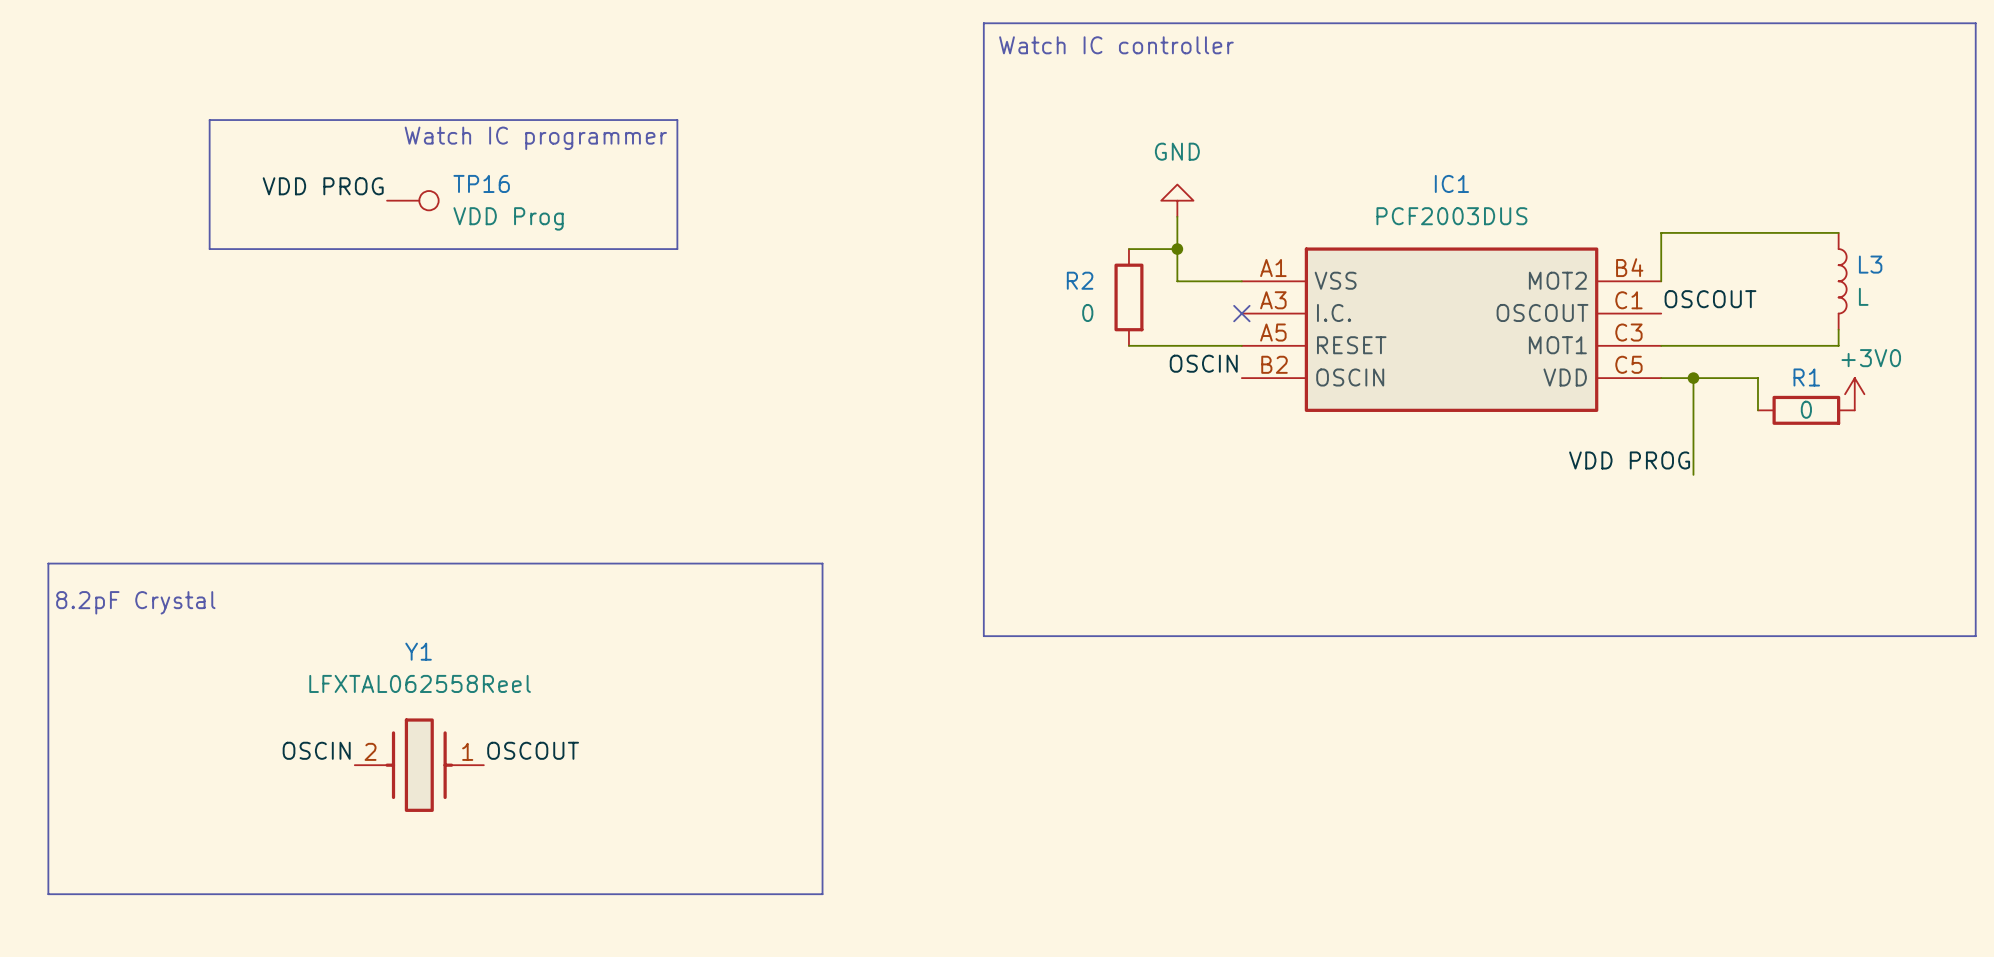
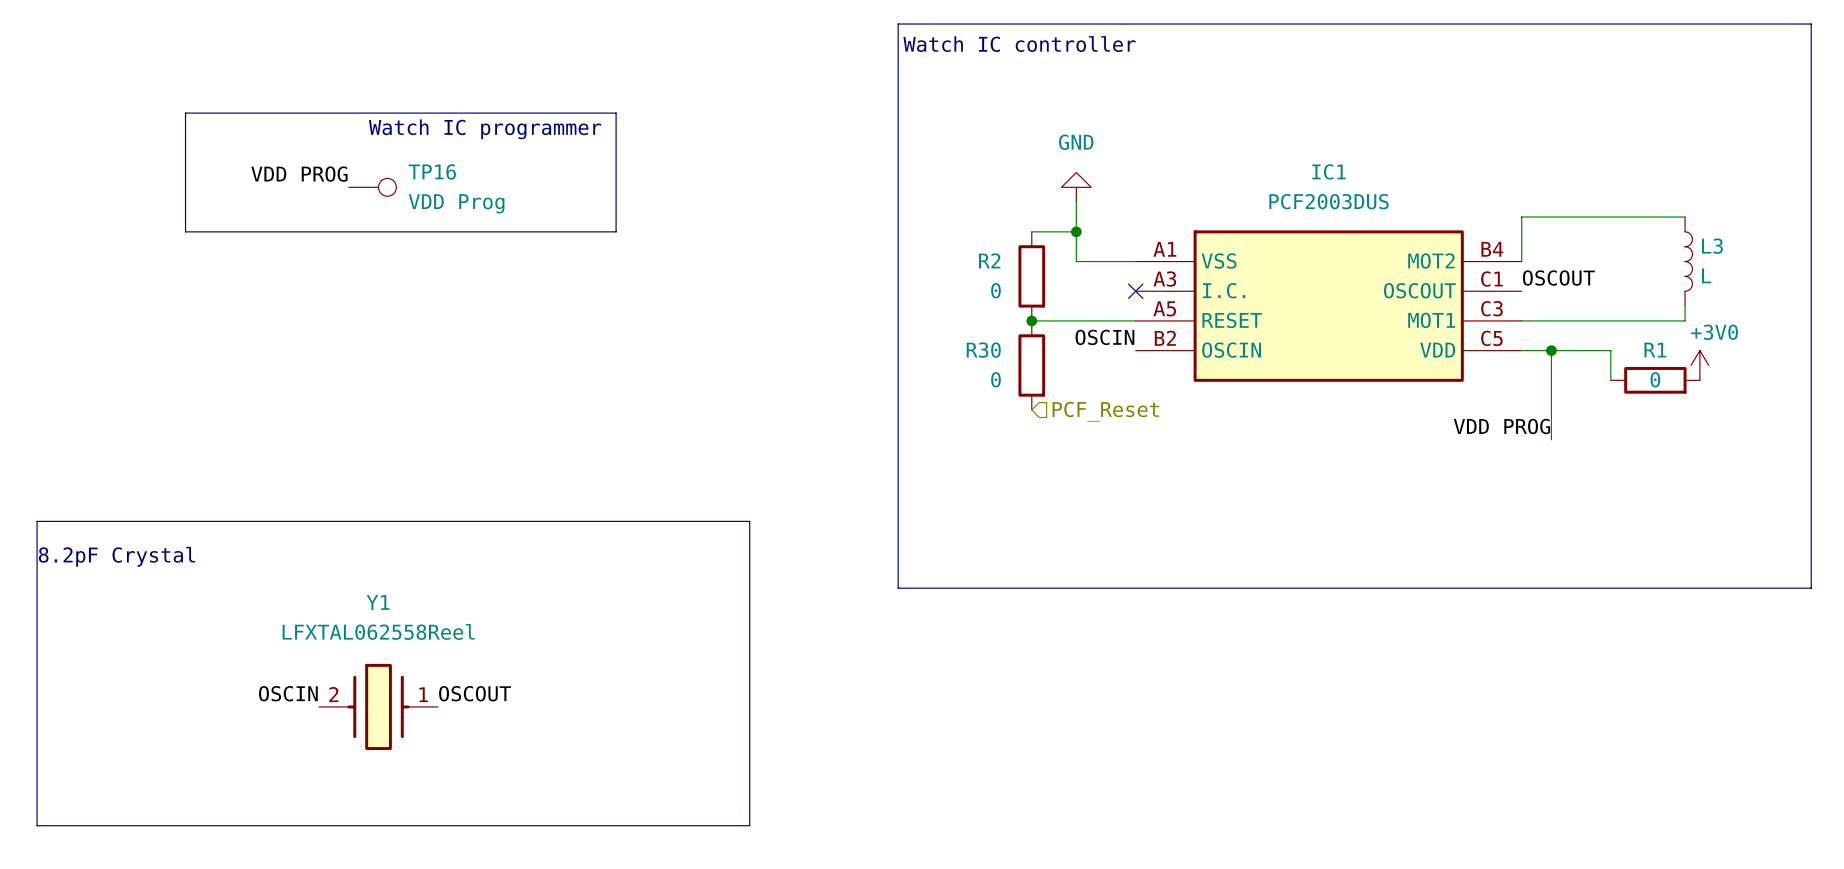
junction: none -> (1031, 320)
R30: none -> 0 (1031, 365)
hierarchical label: none -> PCF_Reset (1105, 411)

